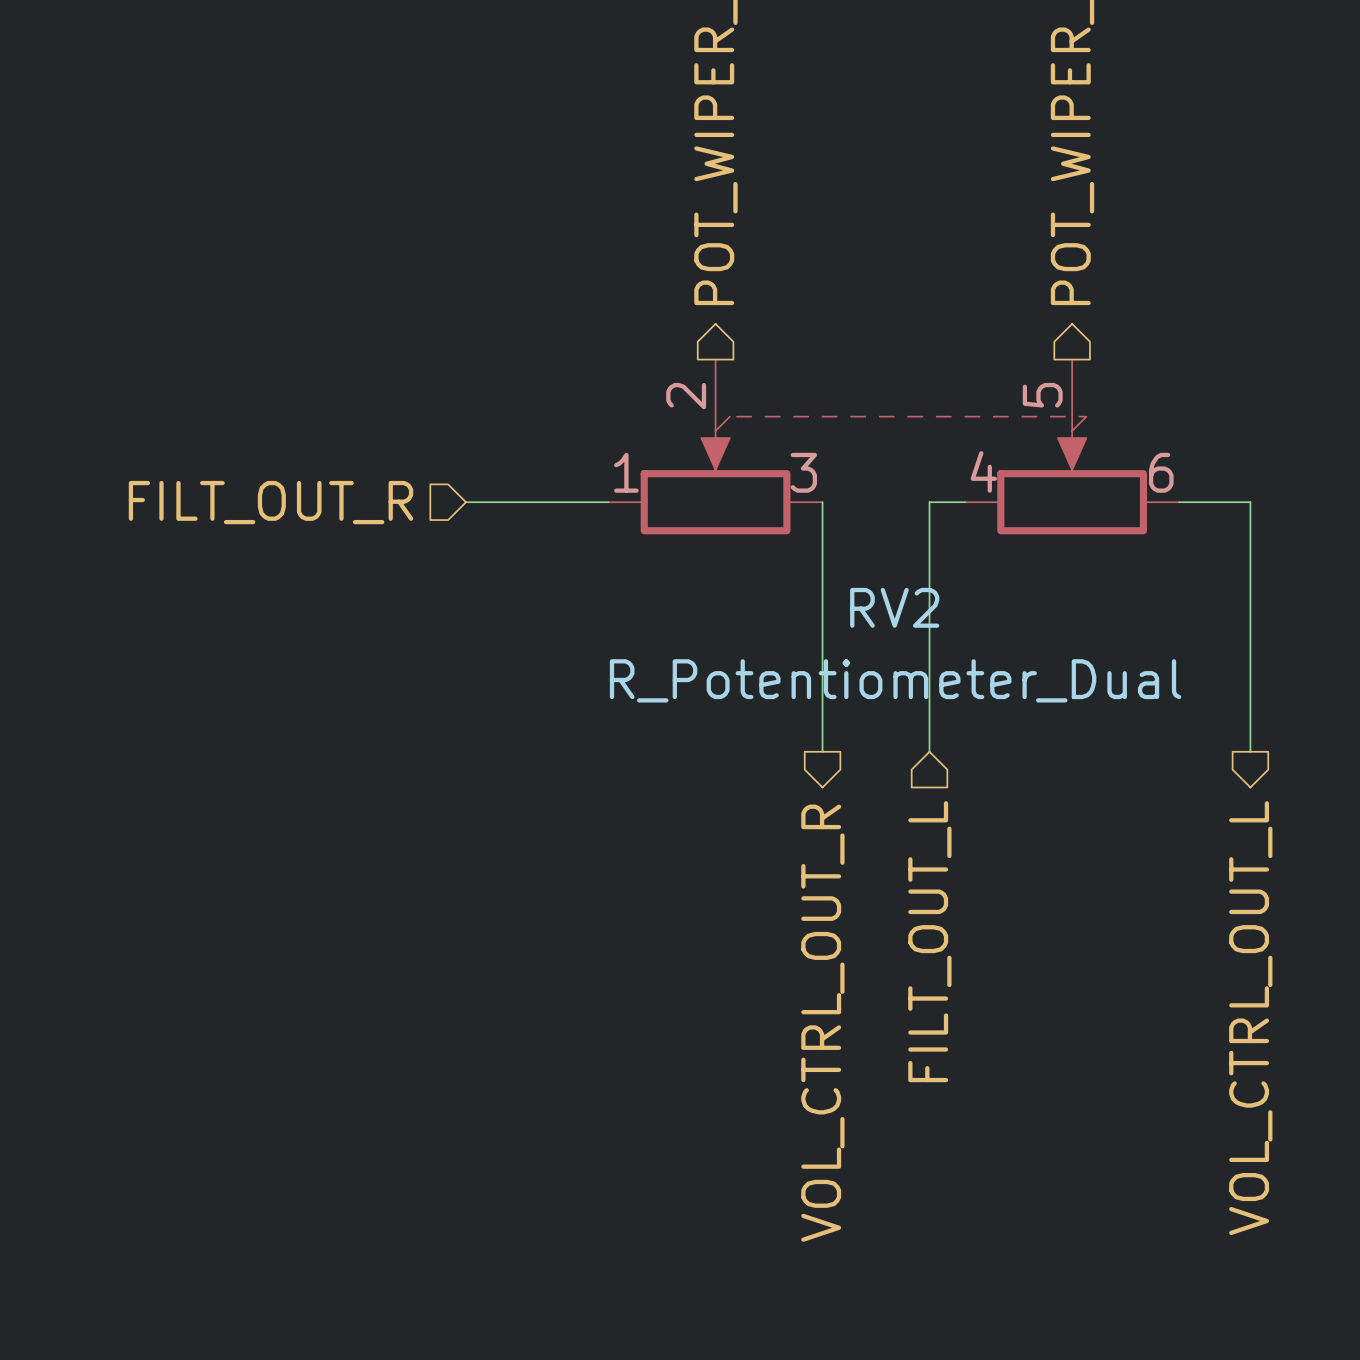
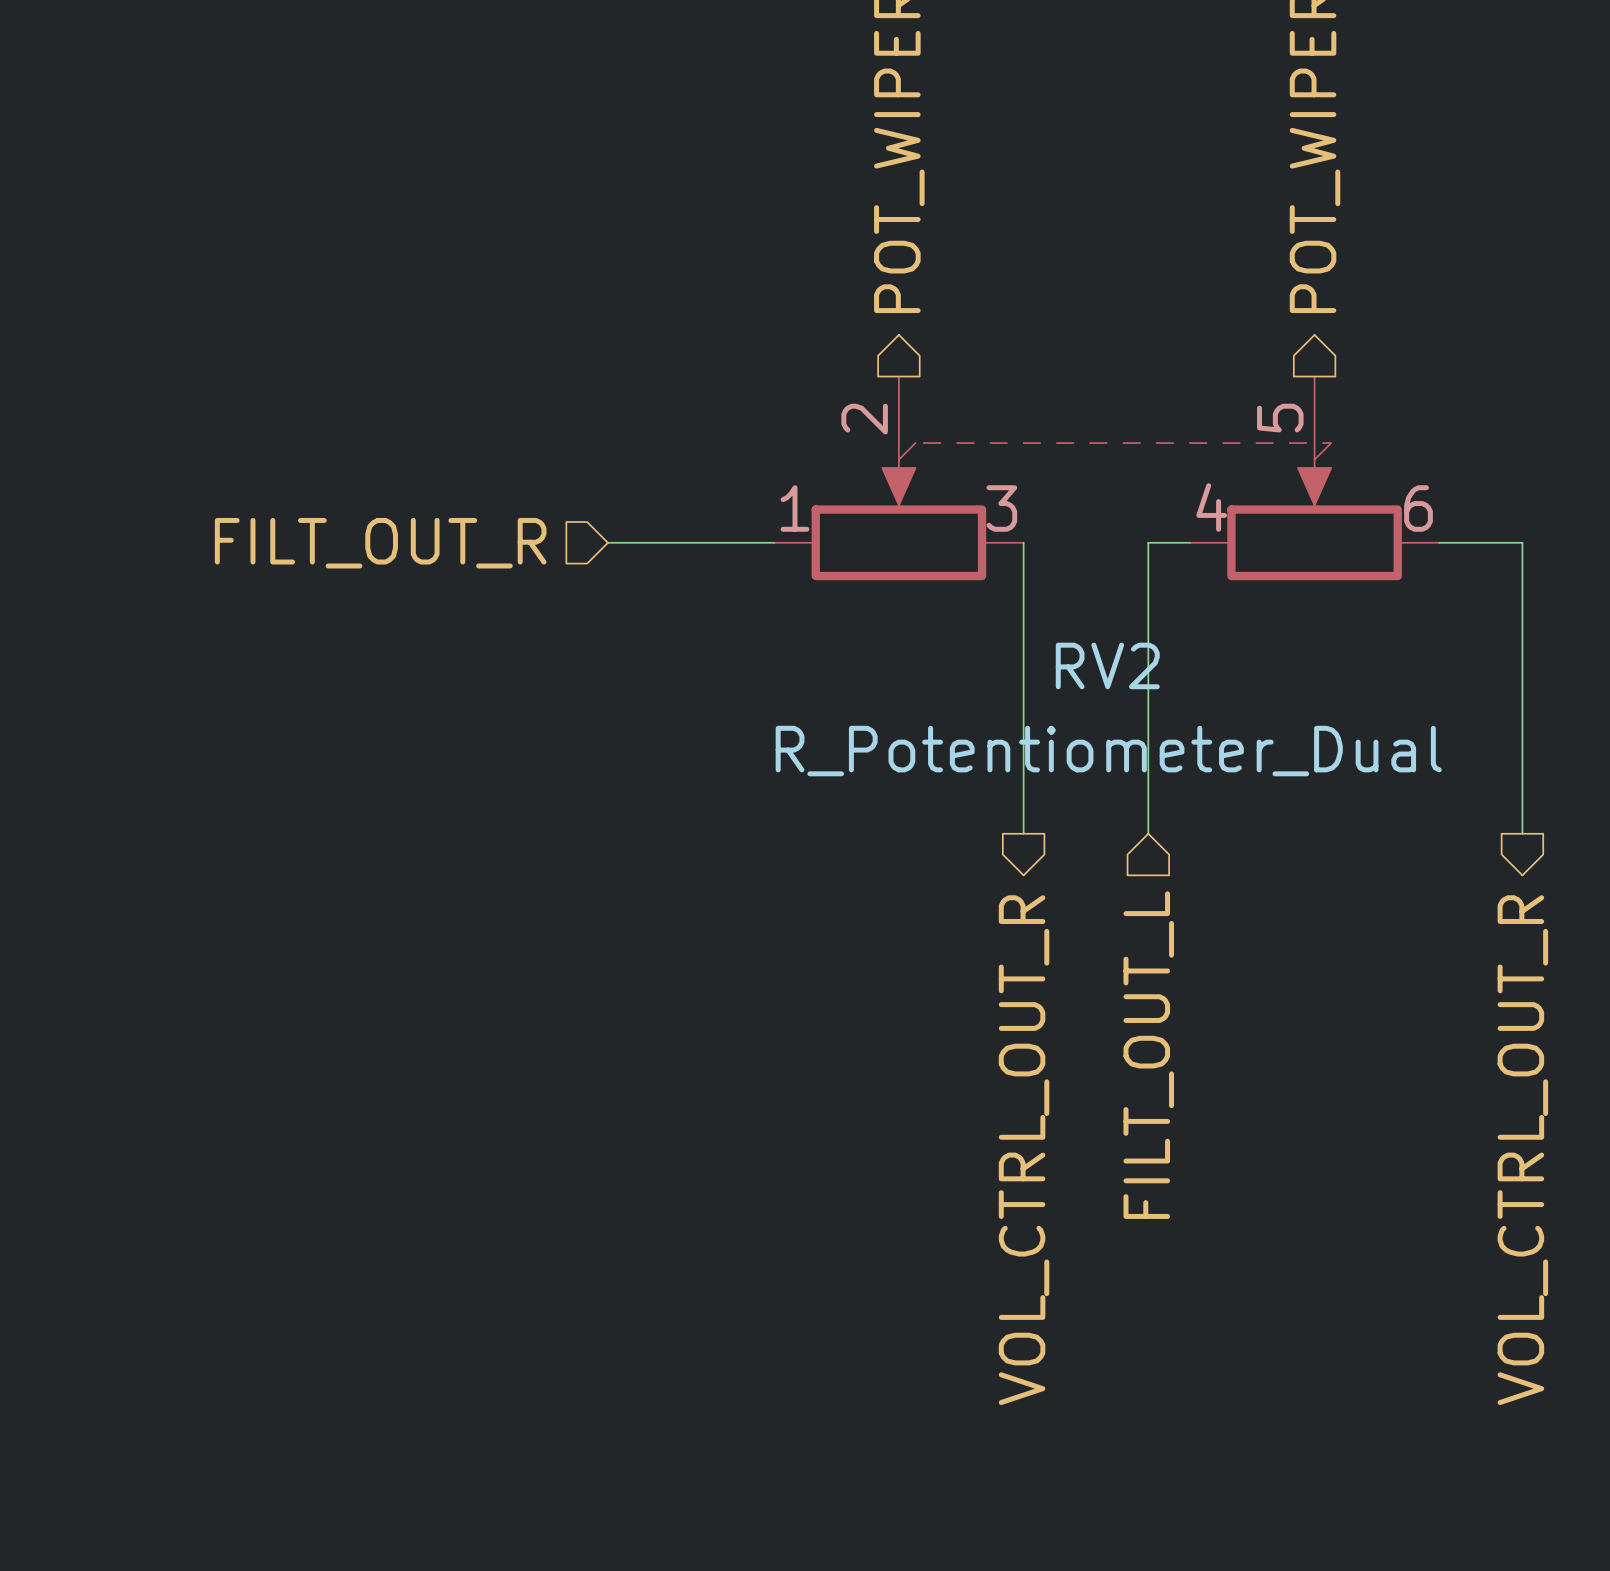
hierarchical label: VOL_CTRL_OUT_L (1250, 1018) -> VOL_CTRL_OUT_R (1522, 1150)

